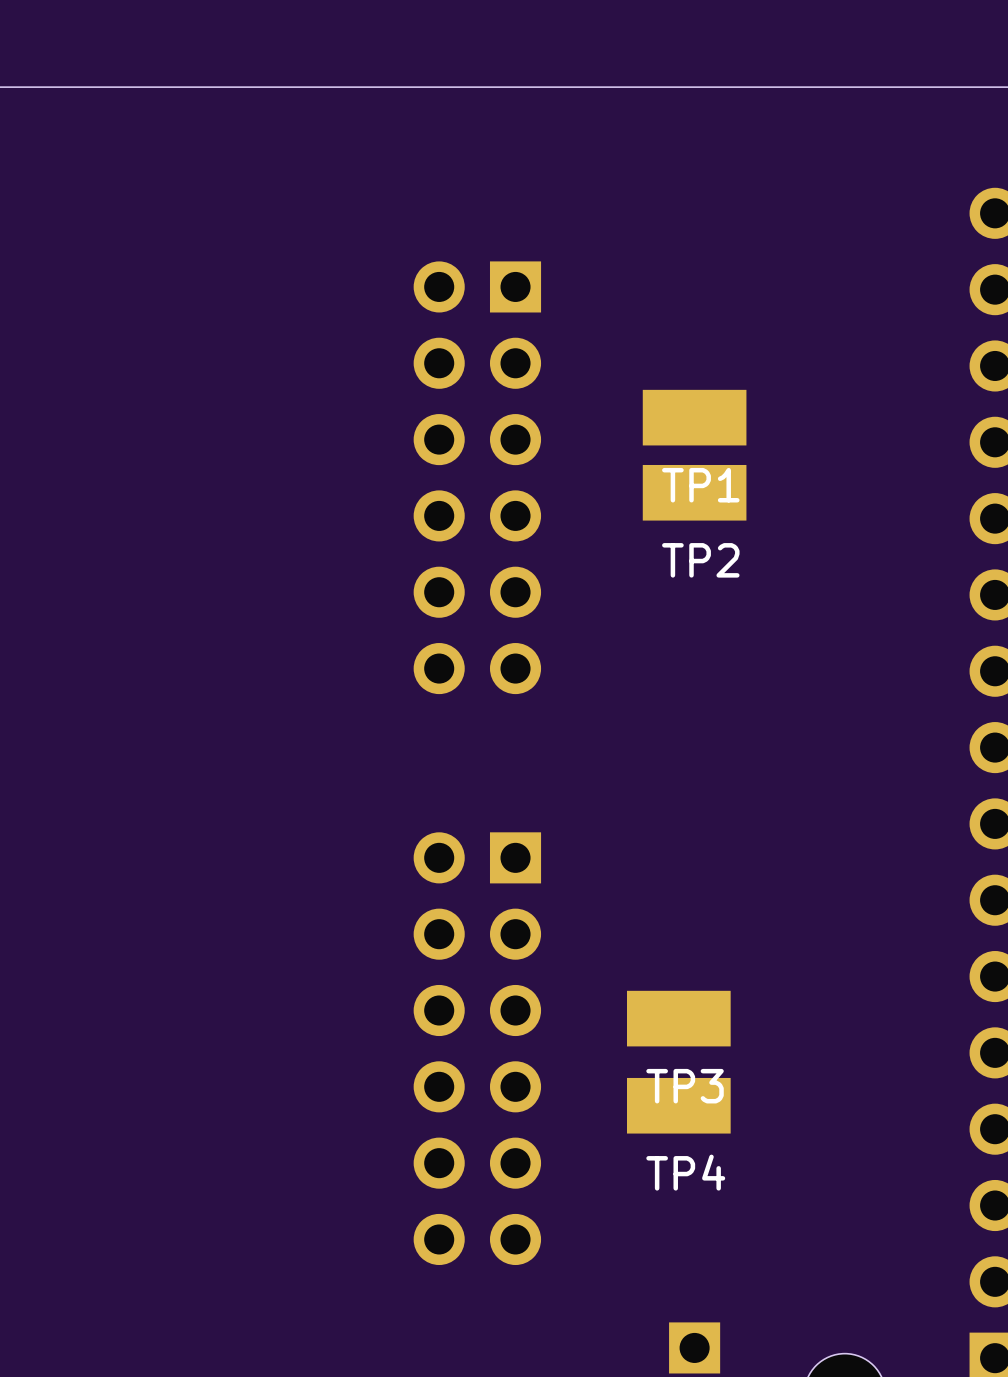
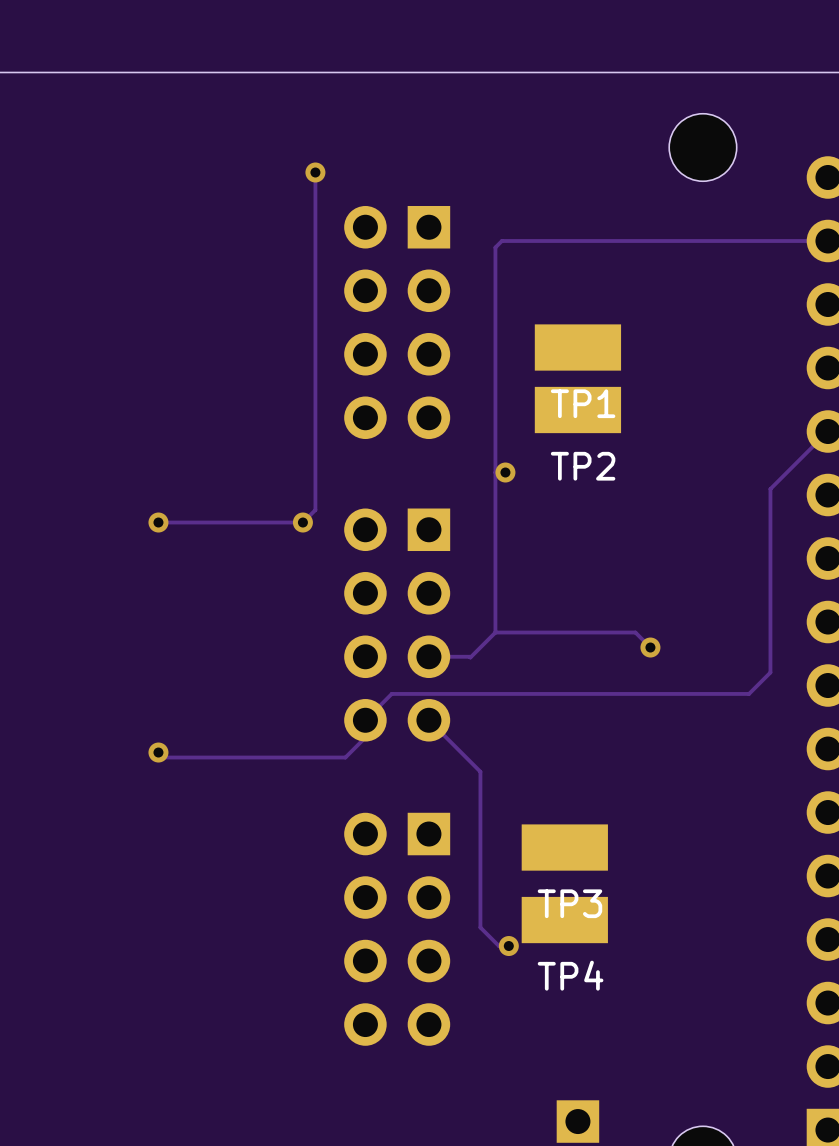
part: none -> (702, 147)
track: none -> (315, 172) (315, 510) (302, 522) (158, 522)
via: none -> (315, 172)
track: none -> (827, 241) (501, 241) (495, 247) (495, 632)
part: none -> (397, 322)
part: (477, 477) -> none
track: none -> (827, 431) (770, 489) (770, 672) (749, 693) (391, 693) (365, 720)
via: none -> (505, 472)
via: none -> (158, 522)
via: none -> (302, 522)
part: none -> (397, 625)
track: none -> (495, 632) (635, 632) (650, 647)
track: none -> (495, 632) (470, 657) (428, 656)
via: none -> (650, 647)
track: none -> (428, 720) (480, 771) (480, 927) (498, 946) (508, 946)
track: none -> (365, 730) (365, 737) (345, 757) (163, 757) (158, 752)
via: none -> (158, 752)
part: (477, 1048) -> none
part: none -> (397, 929)
via: none -> (508, 946)

